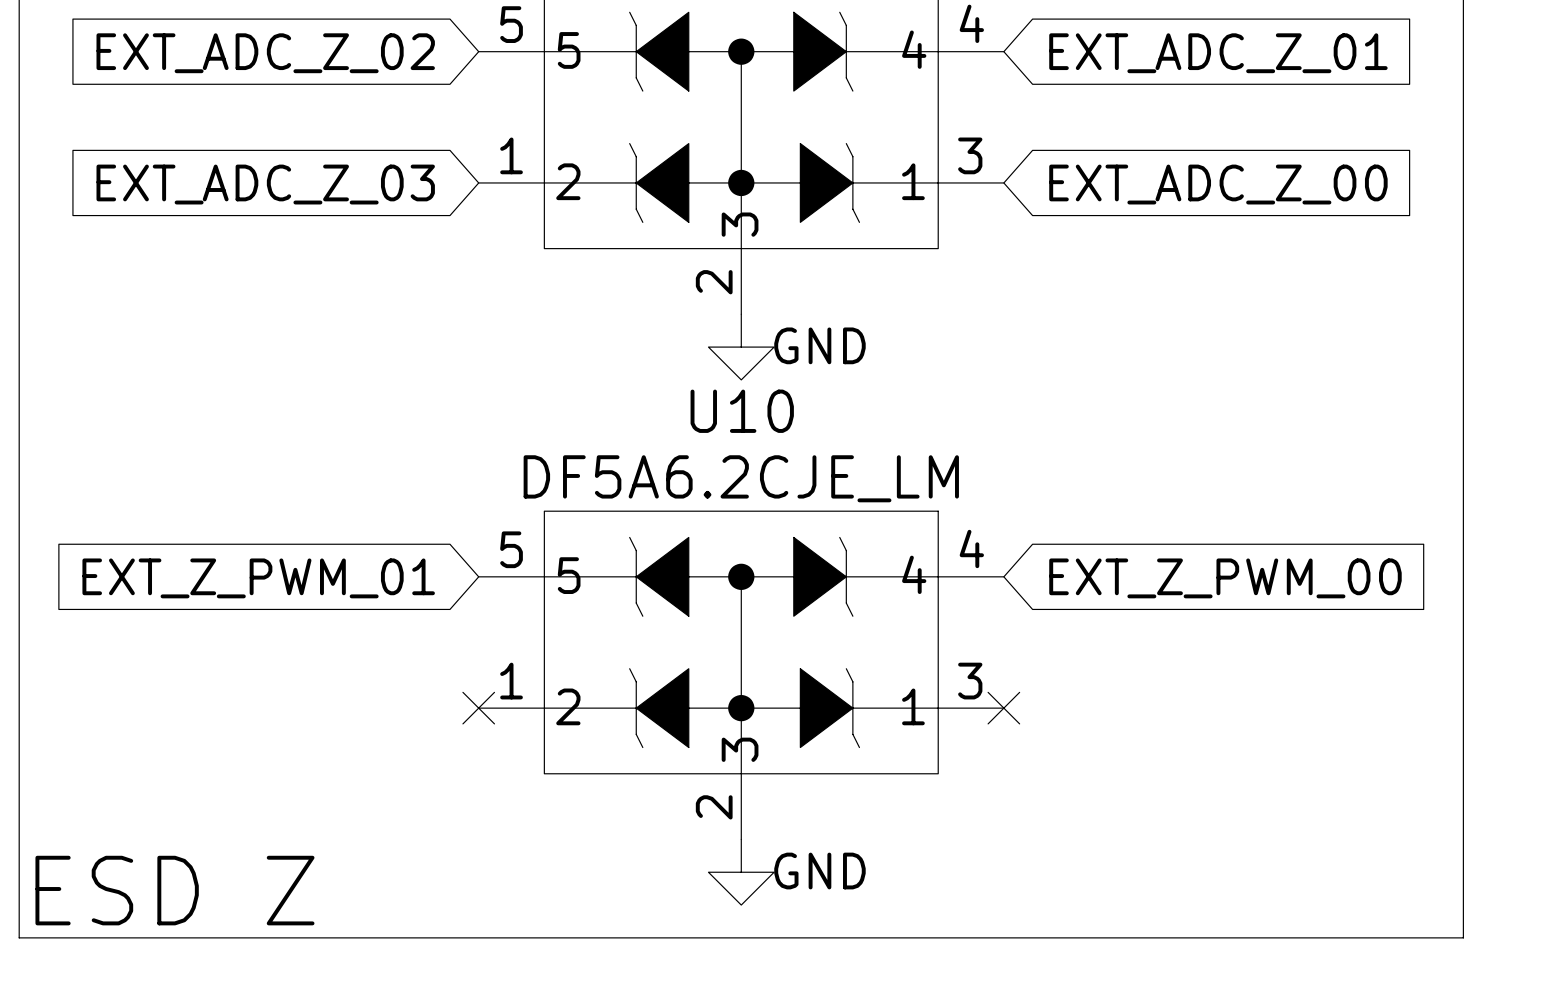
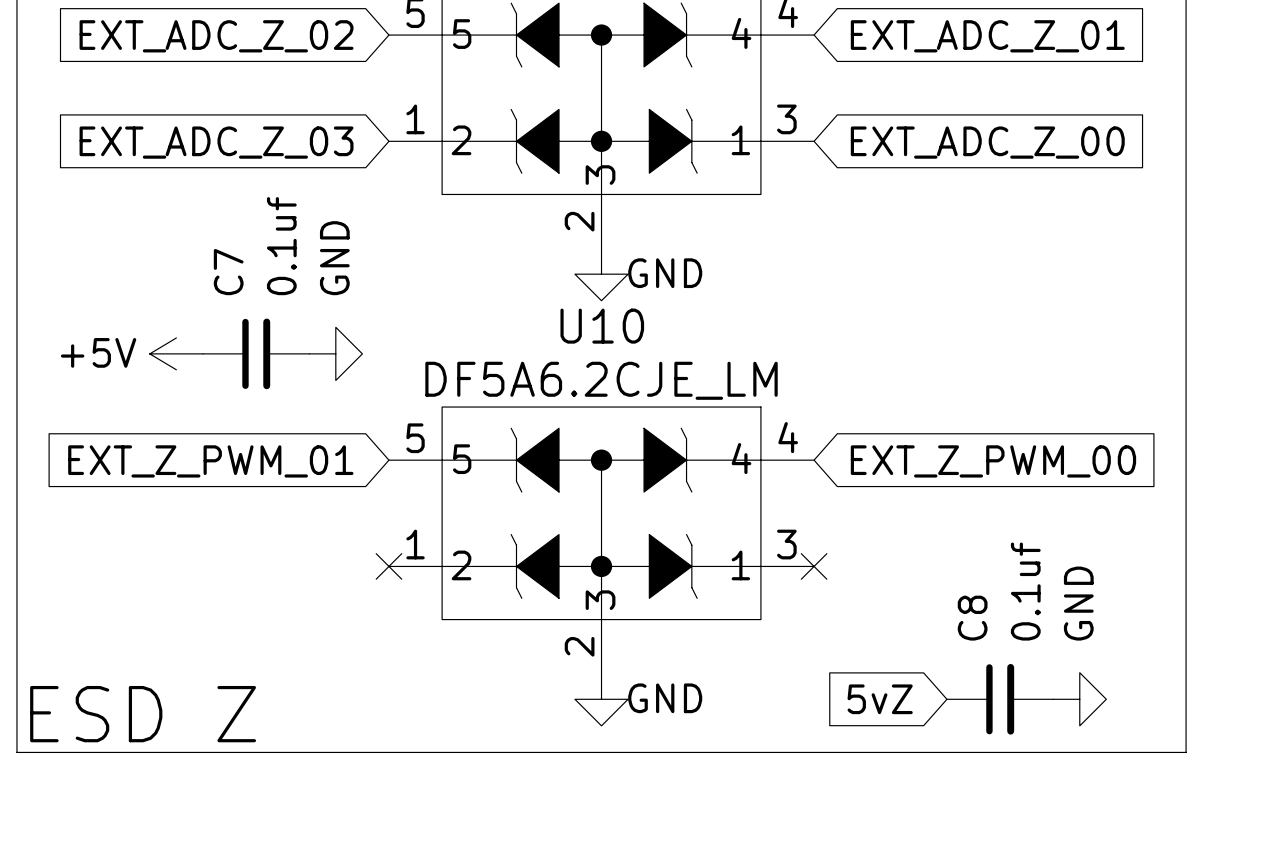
power symbol: none -> +5V (176, 353)
C7: none -> 0.1uf (256, 353)
power symbol: none -> GND (335, 353)
global label: none -> 5vZ (880, 699)
C8: none -> 0.1uf (1000, 699)
power symbol: none -> GND (1079, 699)

